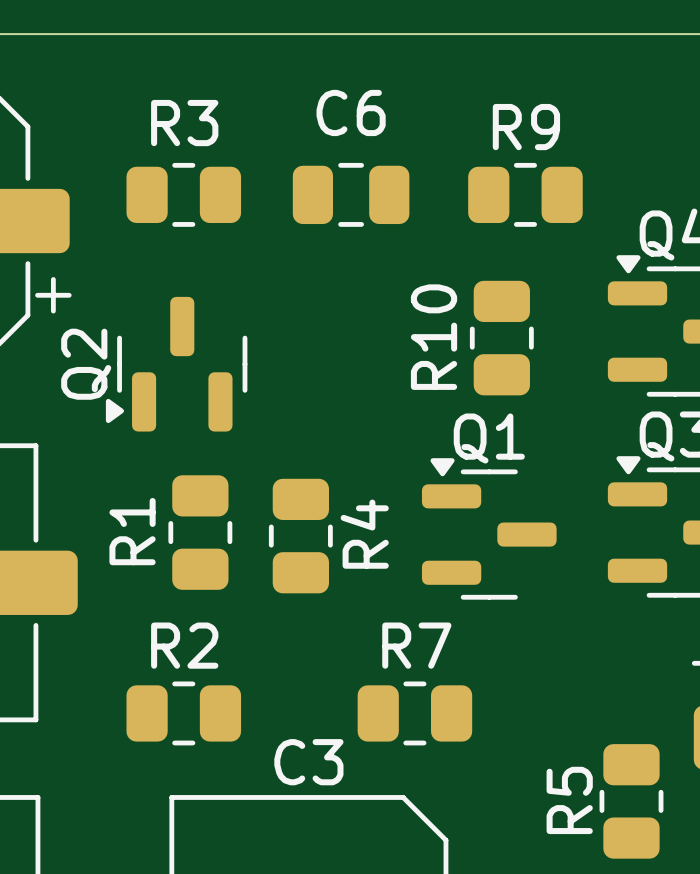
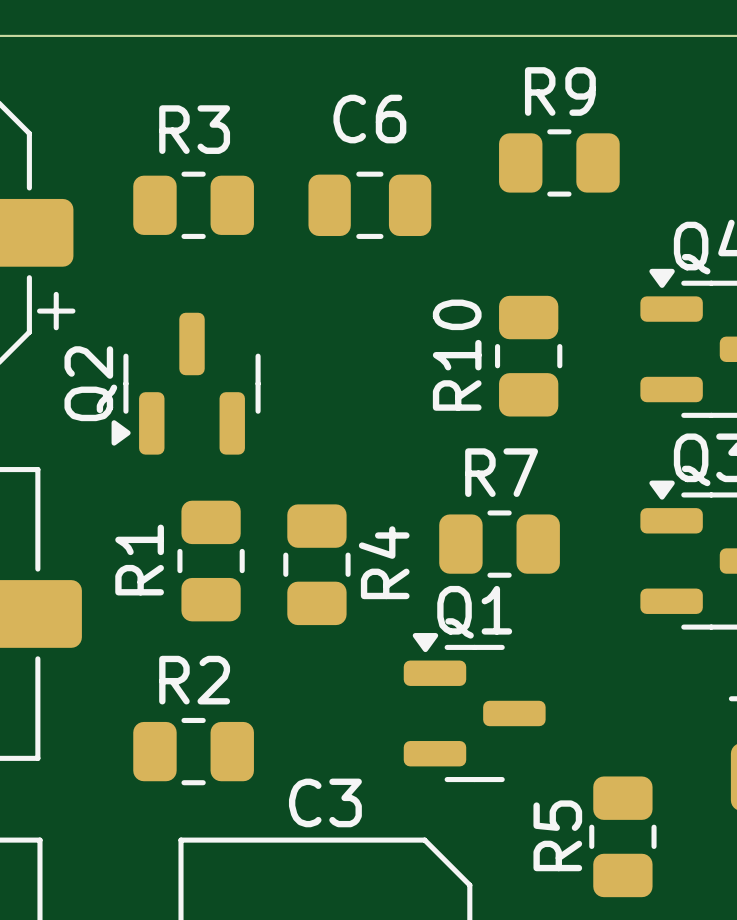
R9 position: (525, 194) -> (559, 162)
Q1 position: (489, 528) -> (474, 707)
R7 position: (414, 713) -> (499, 544)
R5 position: (631, 801) -> (622, 836)

